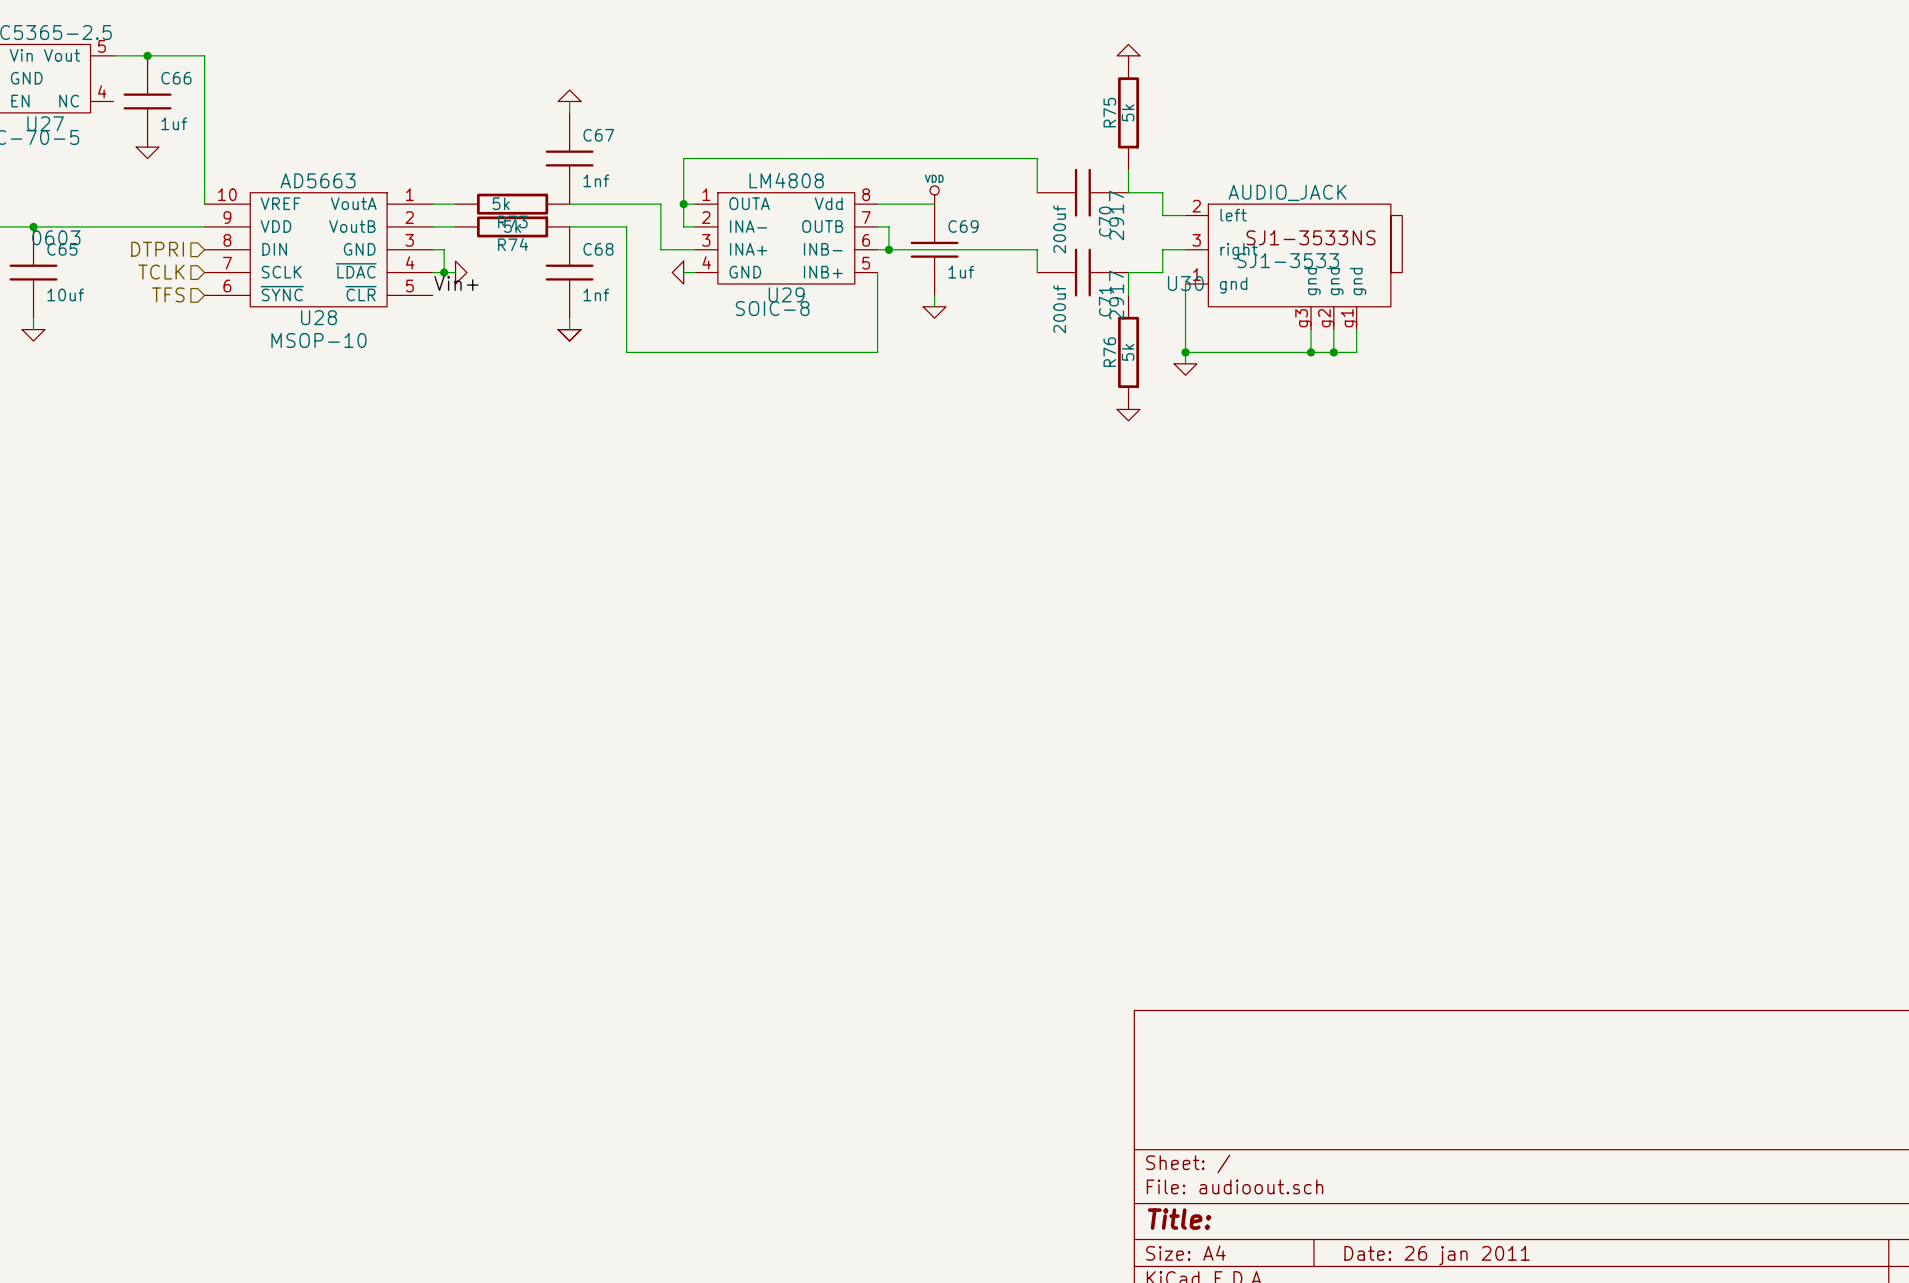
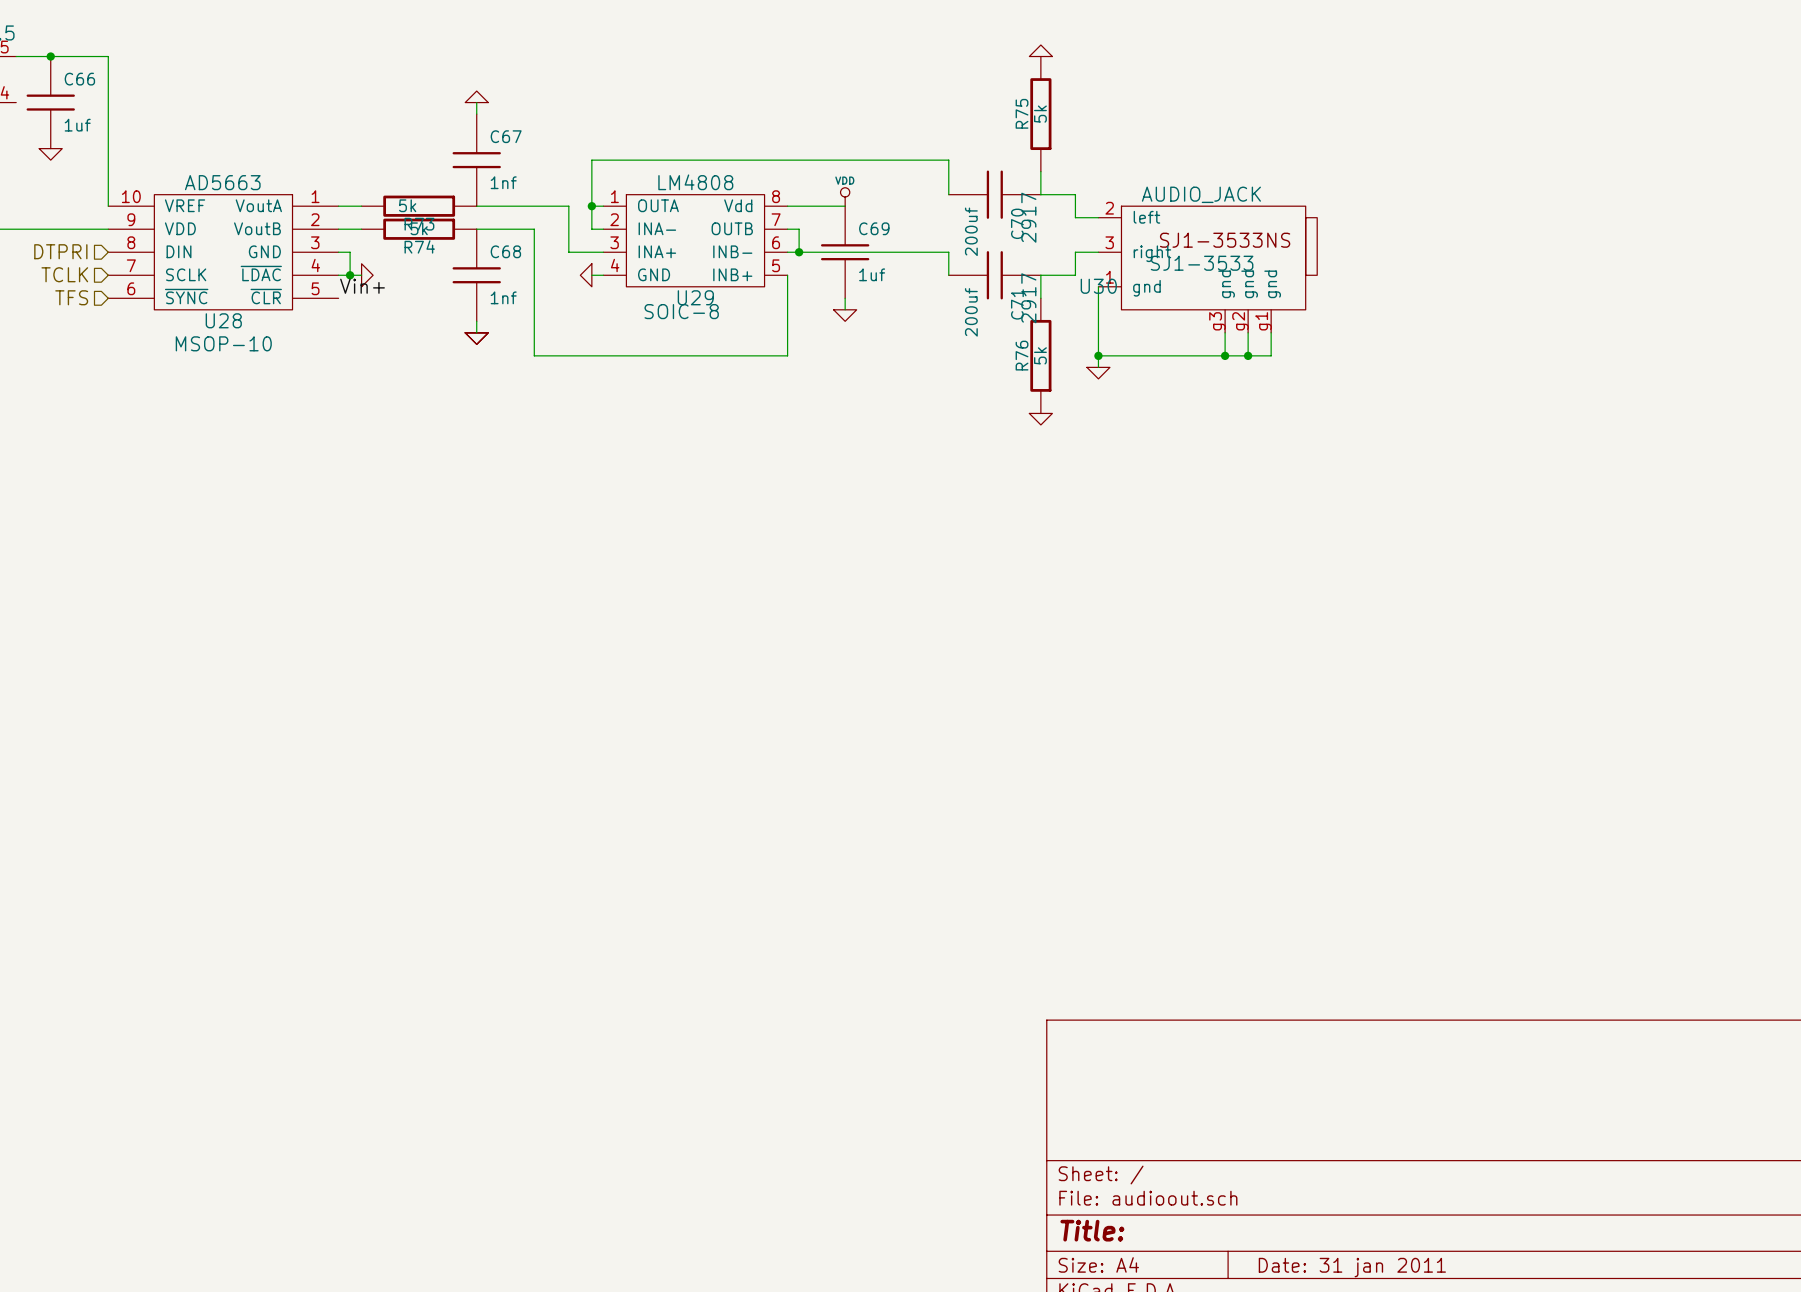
title block: Date: 26 jan 2011 (1437, 1255) -> Date: 31 jan 2011 (1352, 1267)

